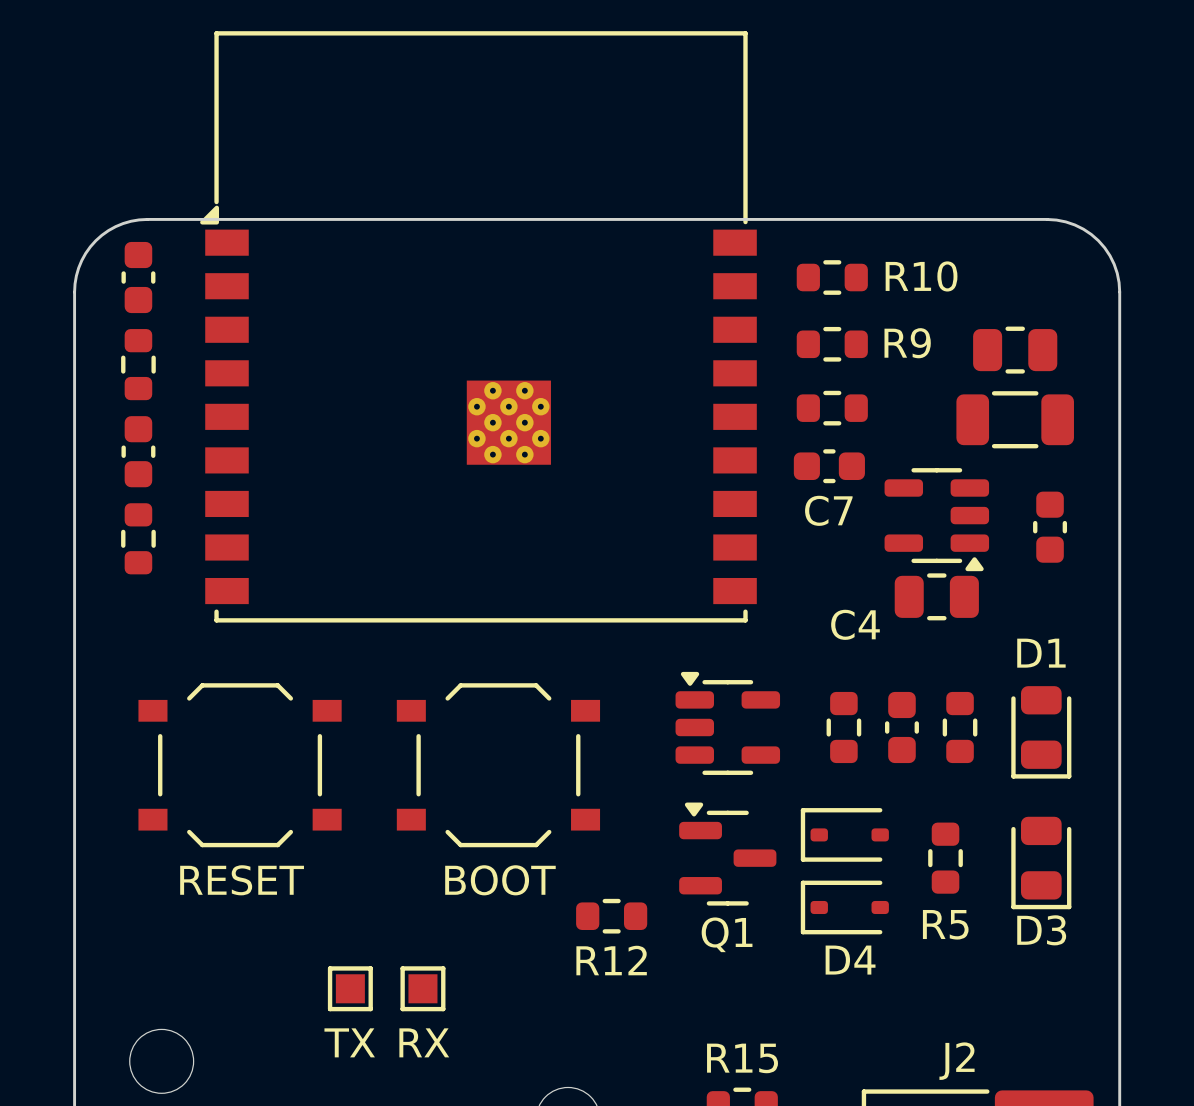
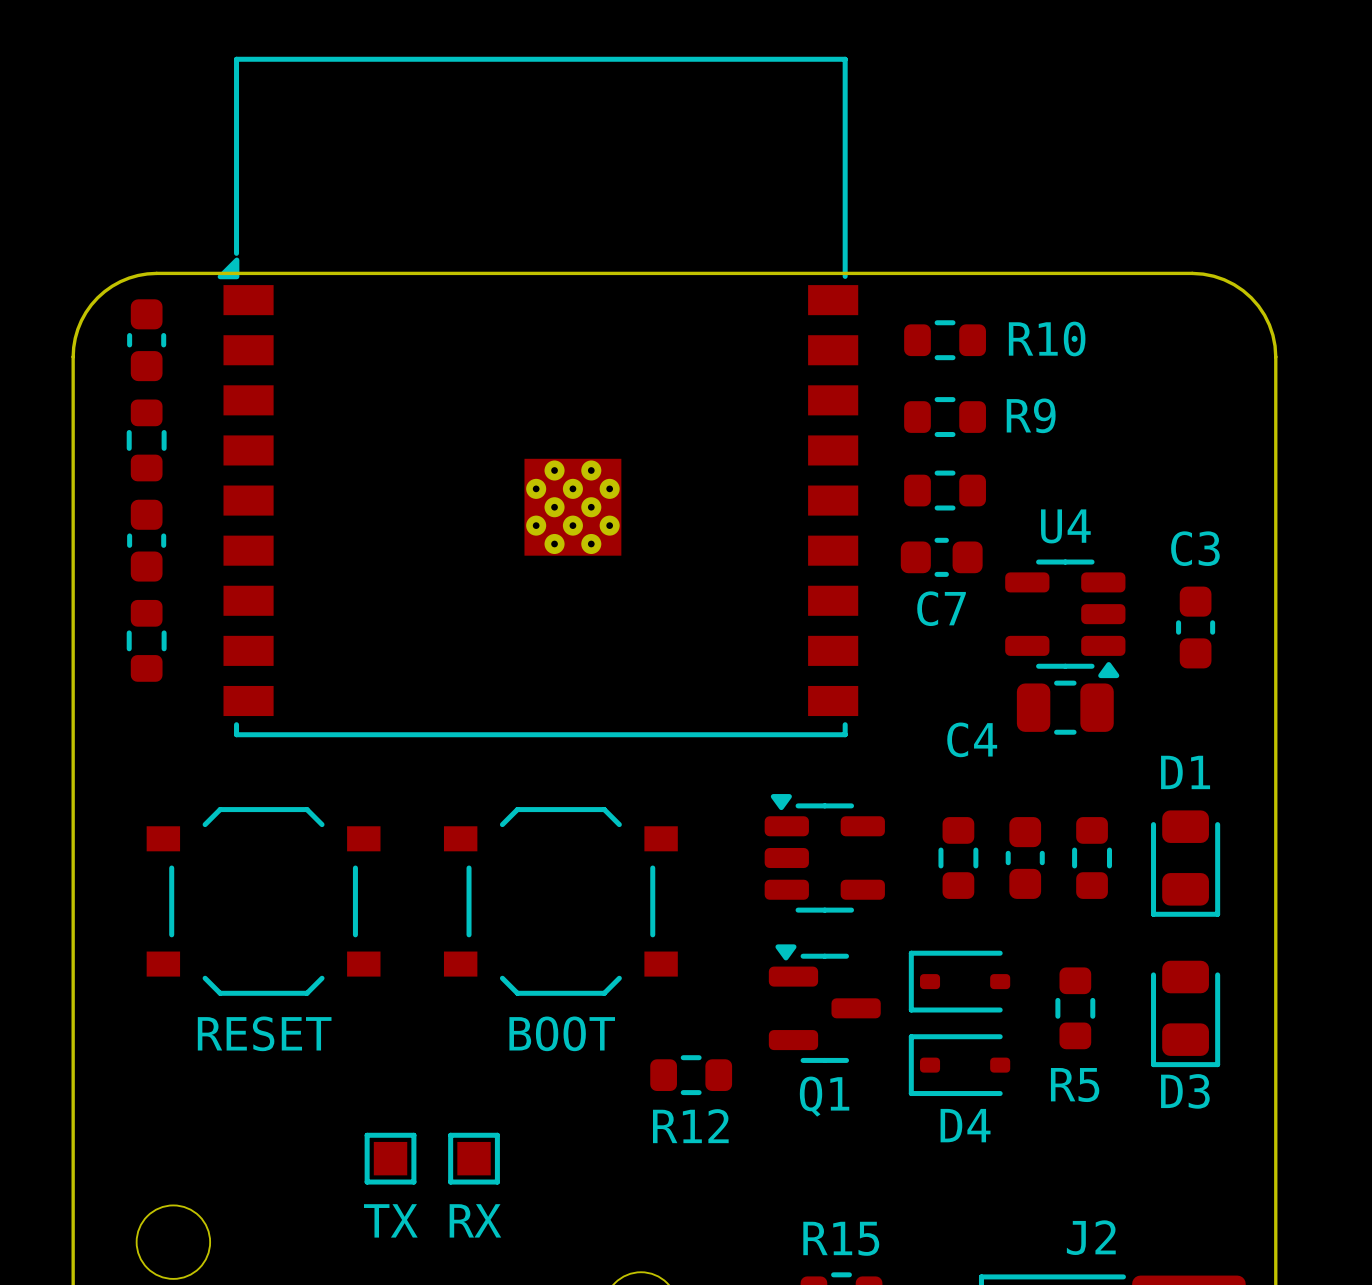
part: (1015, 350) -> none
part: (1015, 419) -> none
U4 name: none -> U4 (1065, 526)
C3 name: none -> C3 (1195, 548)

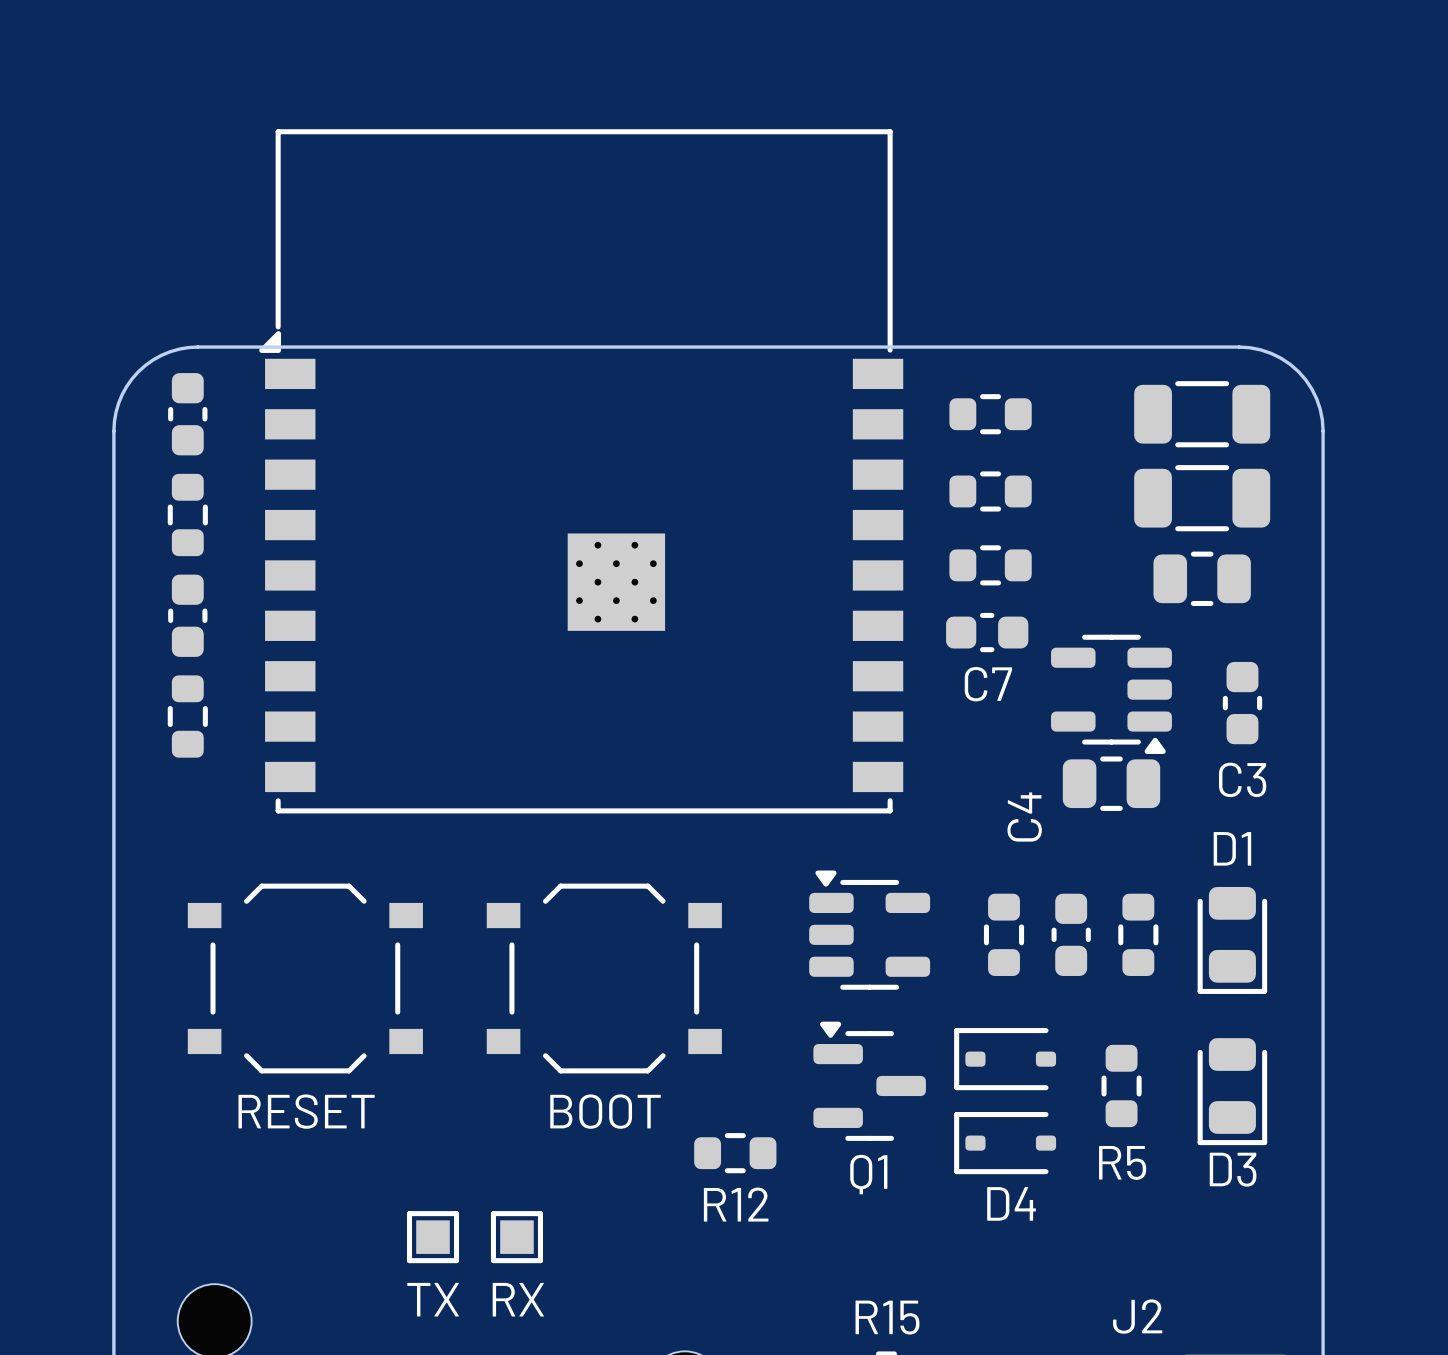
R10 name: R10 (1047, 338) -> none
part: none -> (1202, 414)
R9 name: R9 (1031, 415) -> none
part: none -> (1202, 498)
part: none -> (1202, 578)
U4 name: U4 (1065, 526) -> none
C3 name position: C3 (1195, 548) -> C3 (1242, 779)
C4 name rotation: 0° (972, 739) -> 90° counterclockwise (1024, 817)

